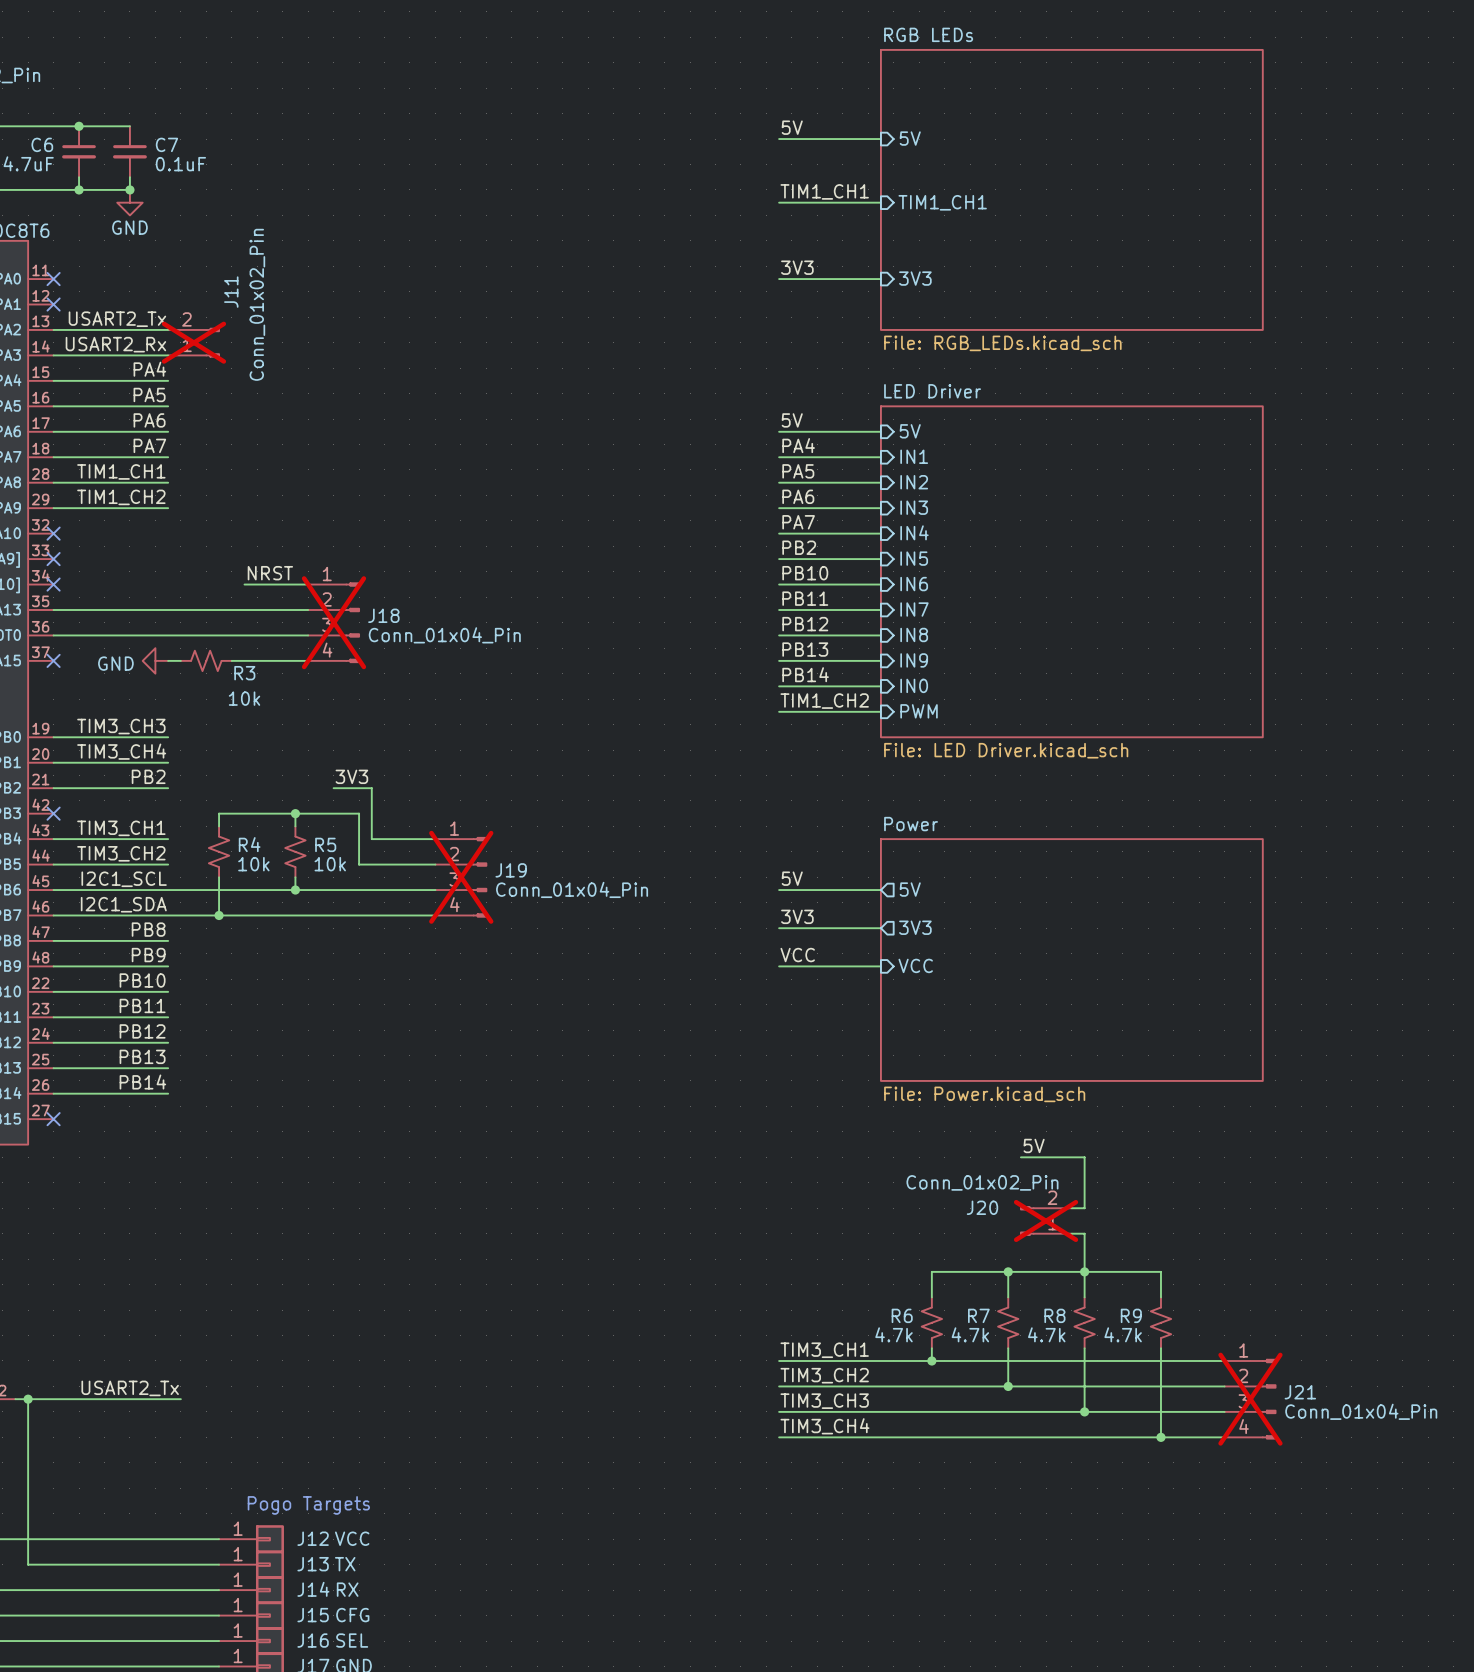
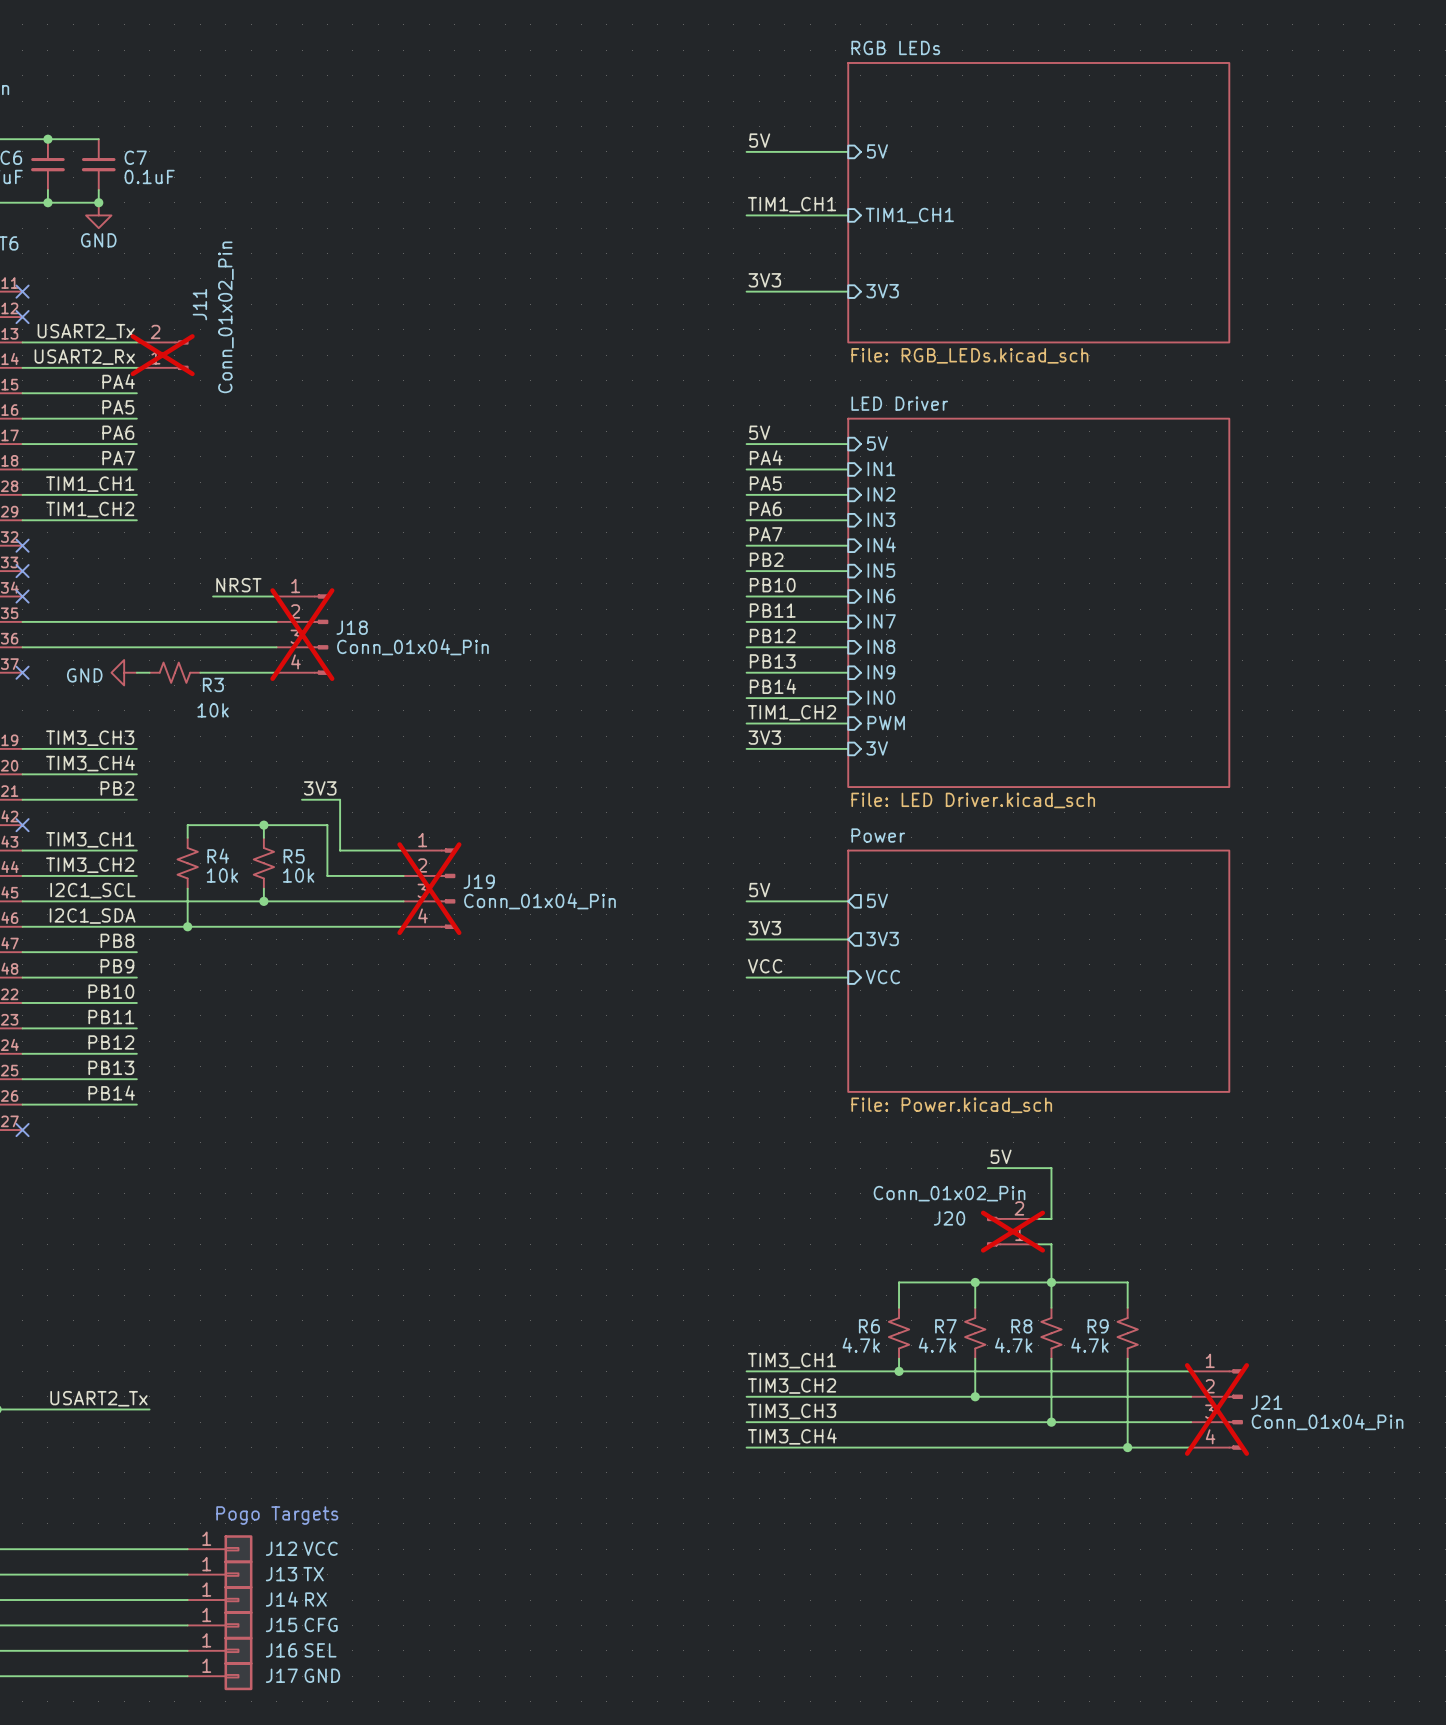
sheet LED Driver: File: LED Driver.kicad_sch (1071, 571) -> none
sheet LED Driver: none -> File: LED Driver.kicad_sch (1038, 602)
label: none -> 3V3 (764, 737)
sheet pin: none -> 3V (877, 748)
wire: none -> (746, 748) (848, 748)

